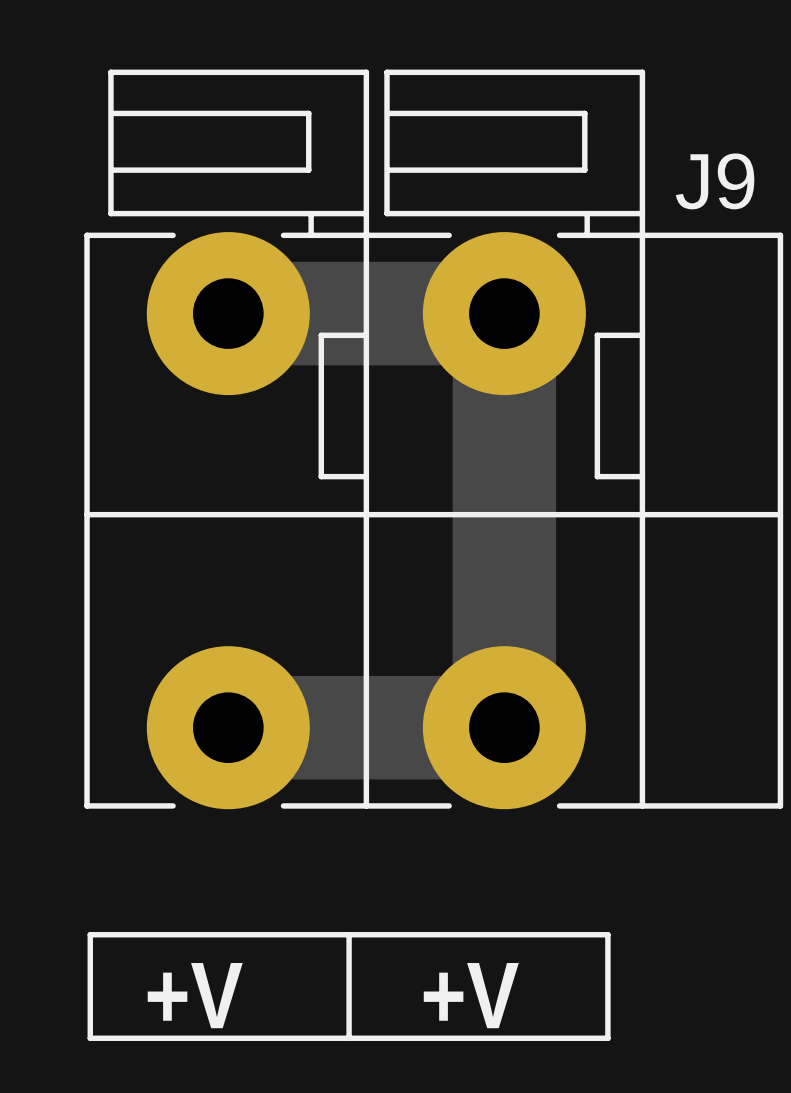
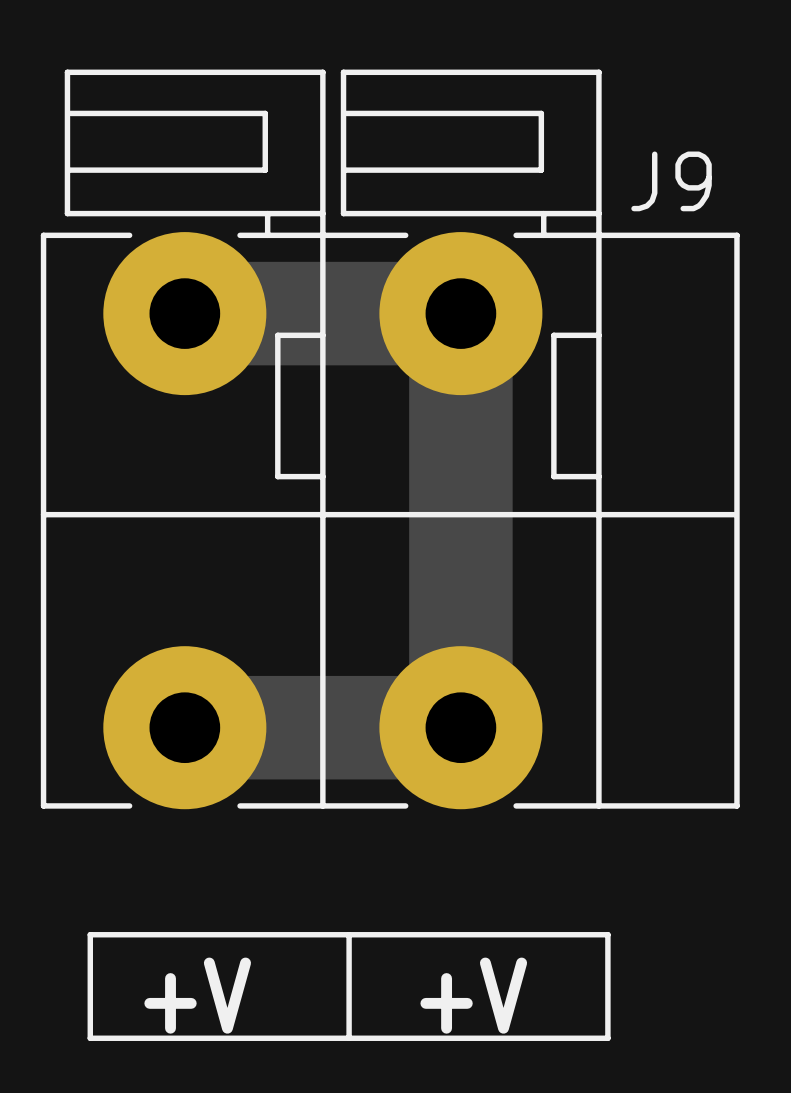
track: (460, 313) (504, 313) (504, 727) (460, 727) -> (460, 313) (460, 727)
J9 position: (433, 439) -> (390, 439)

